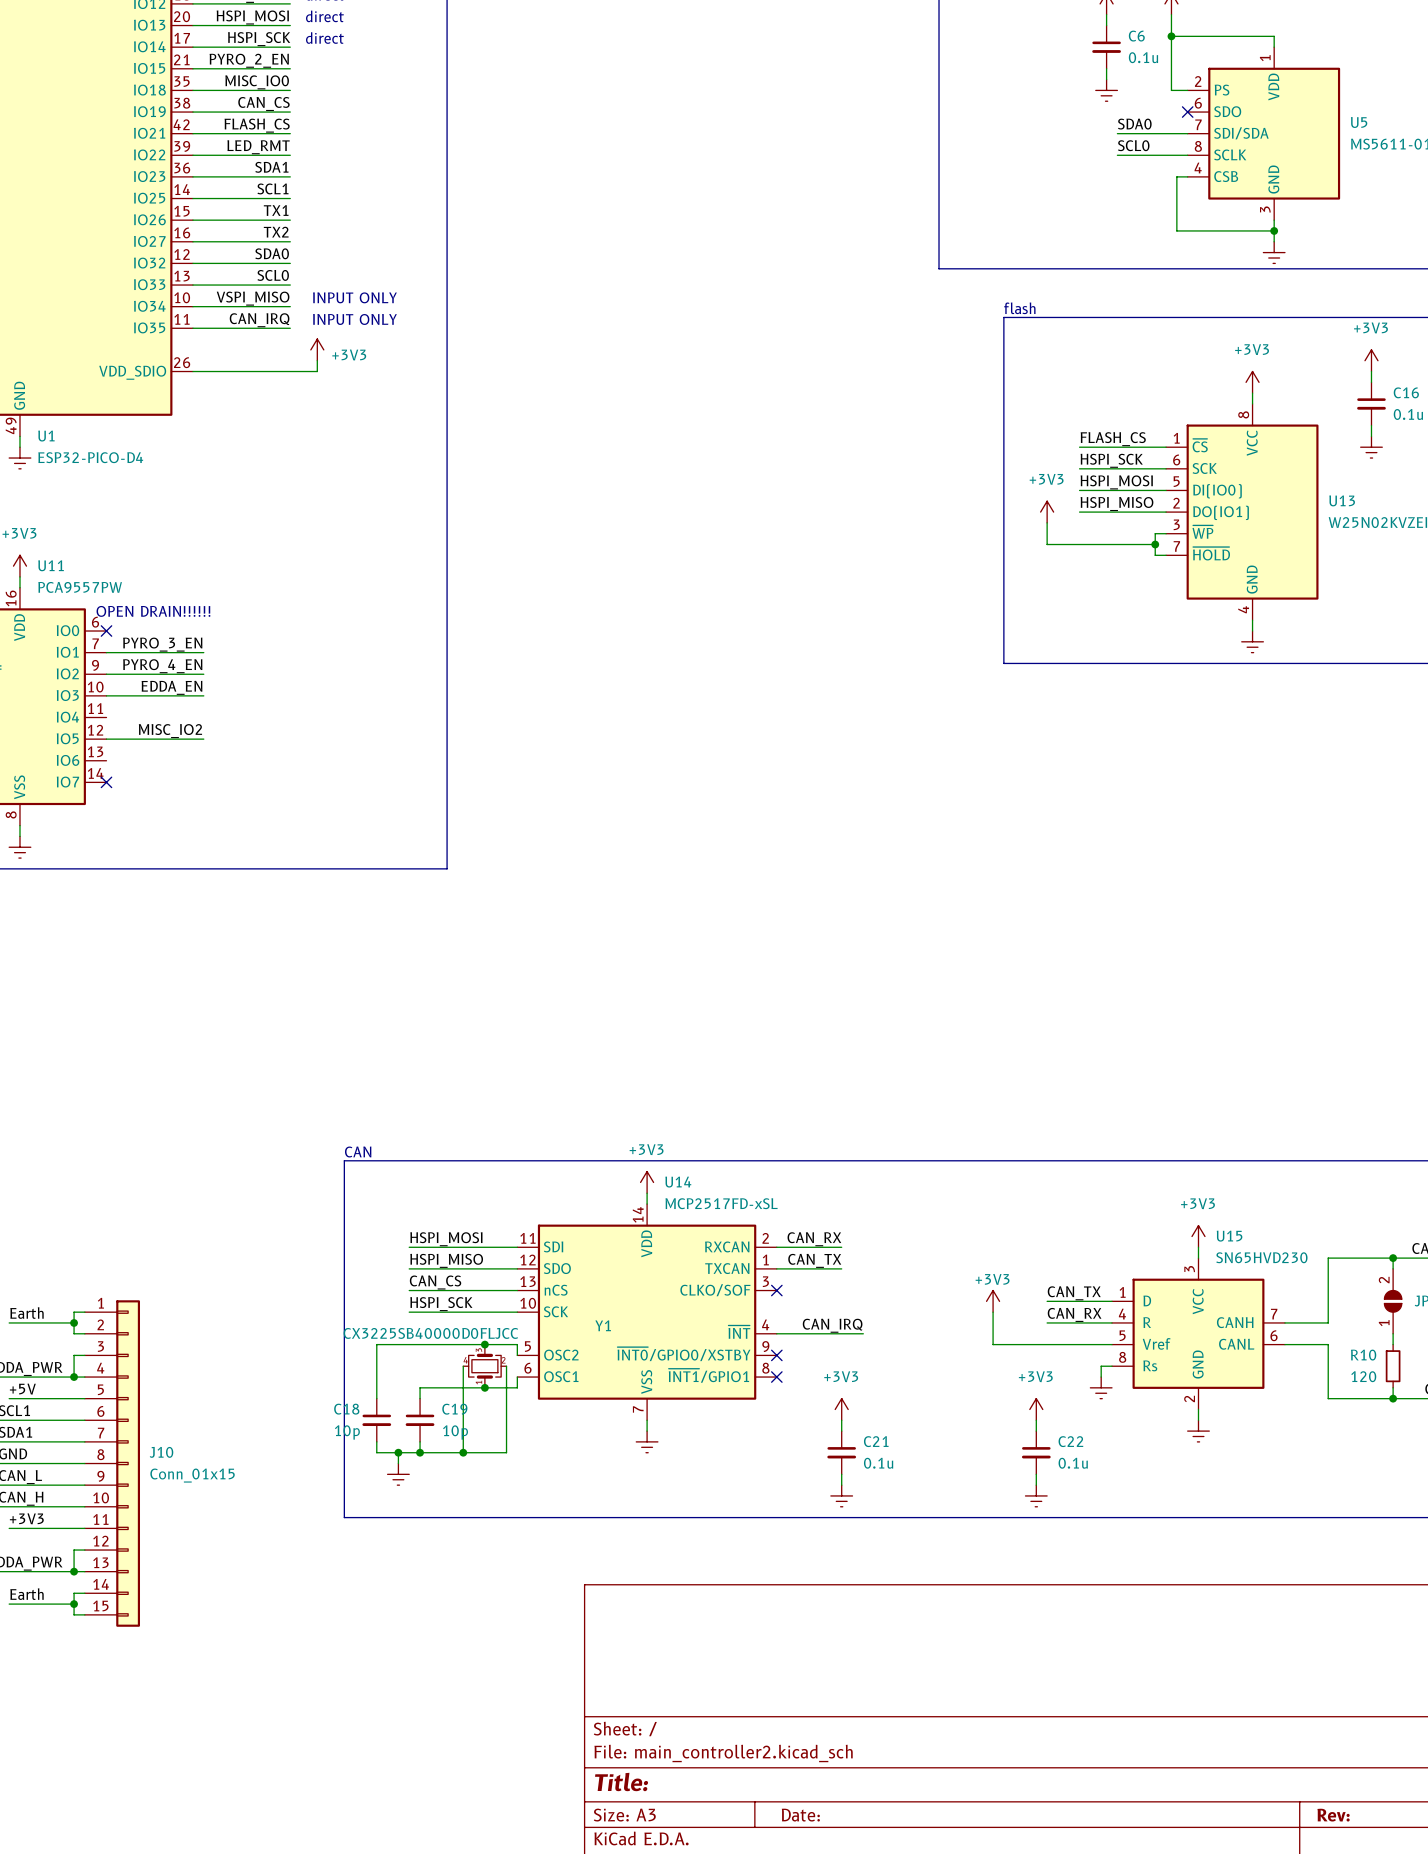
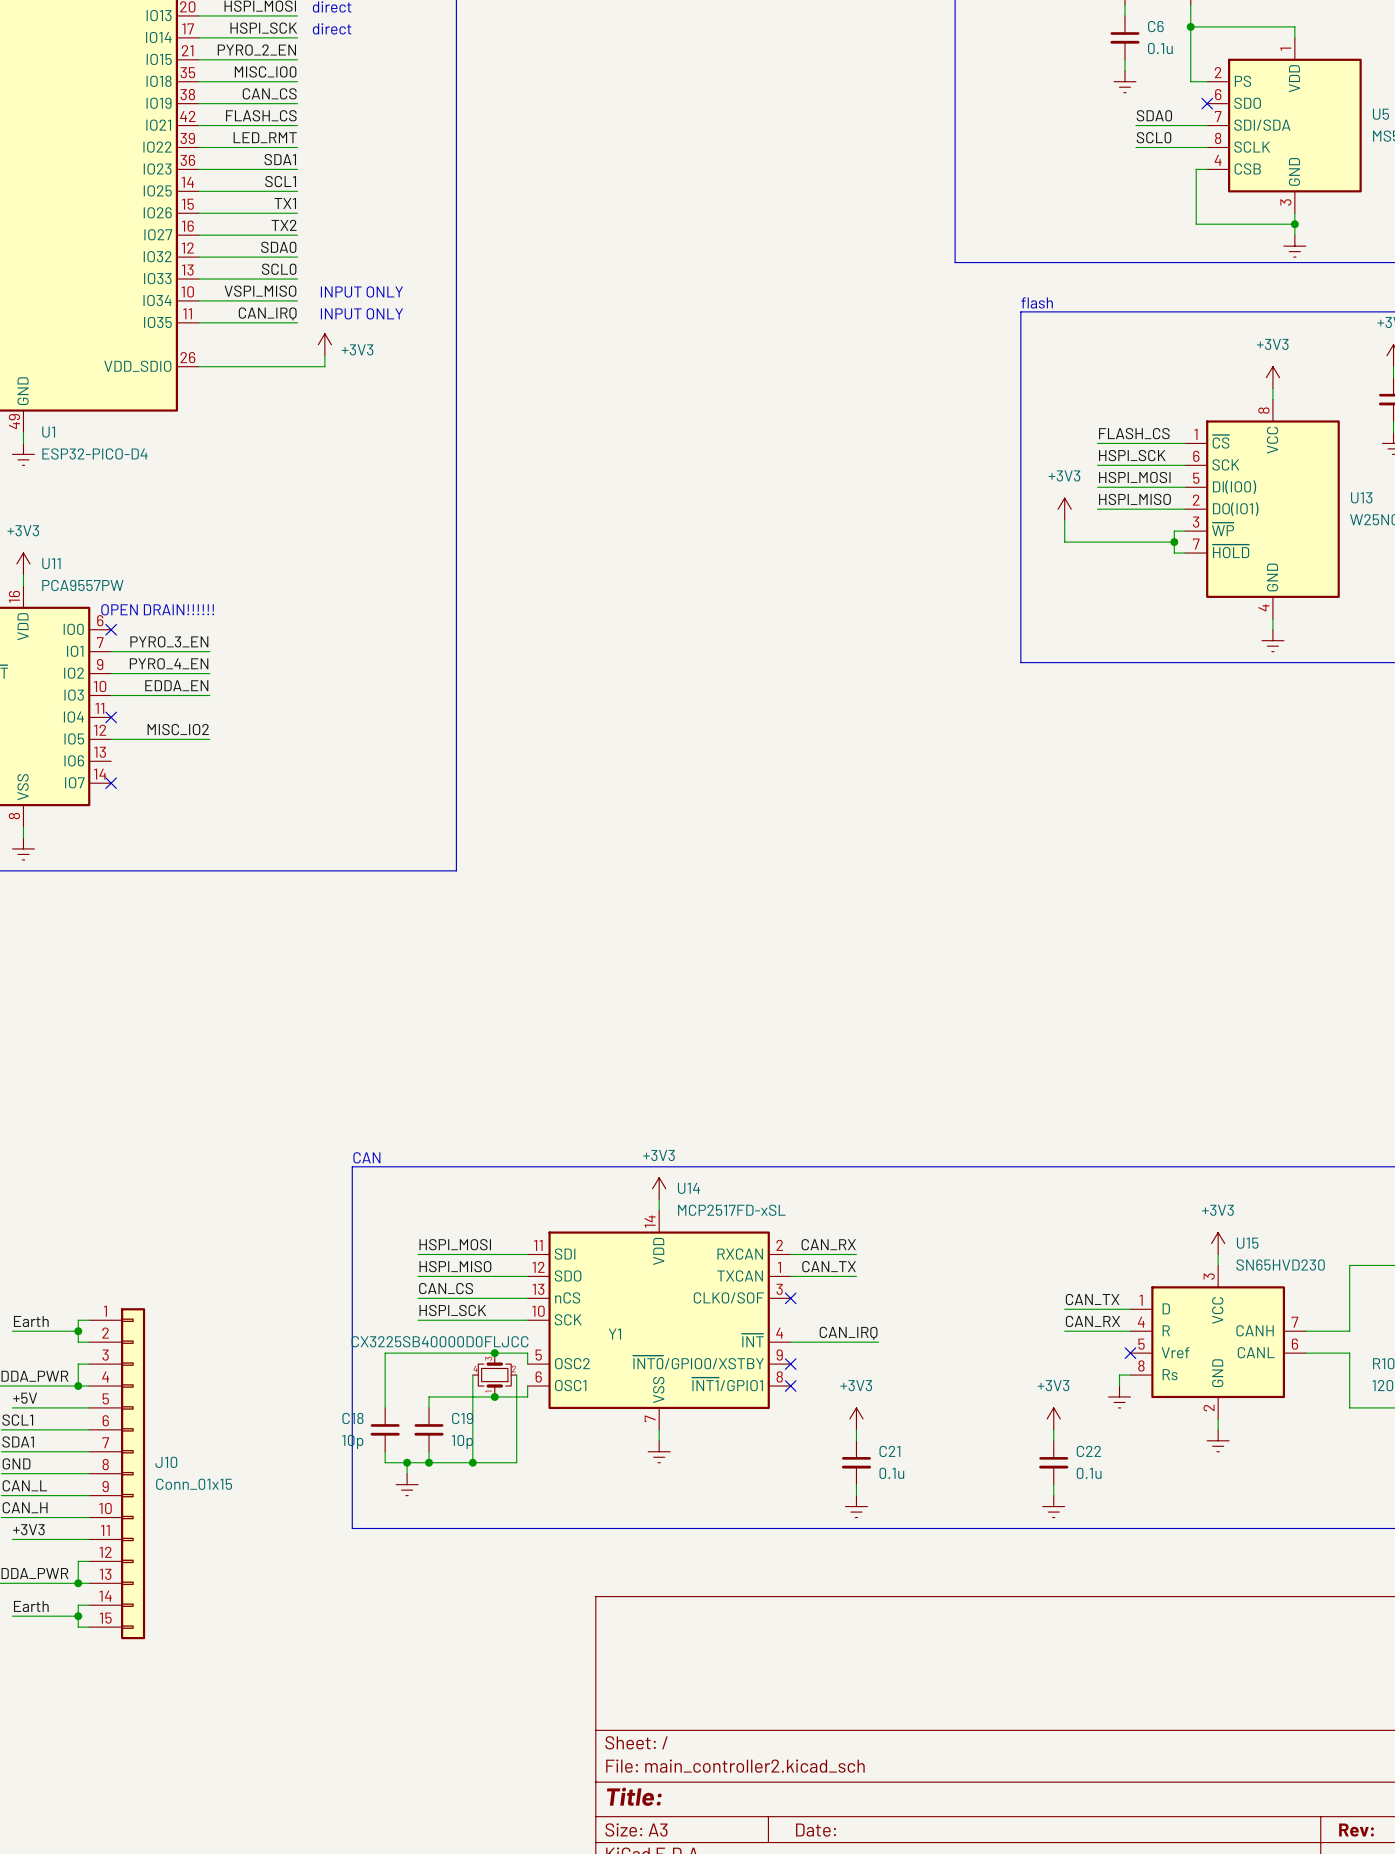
no-connect mark: none -> (111, 717)
power symbol: +3V3 (993, 1301) -> none
wire: (993, 1312) (993, 1344) (1111, 1344) -> none
no-connect mark: none -> (1130, 1353)

